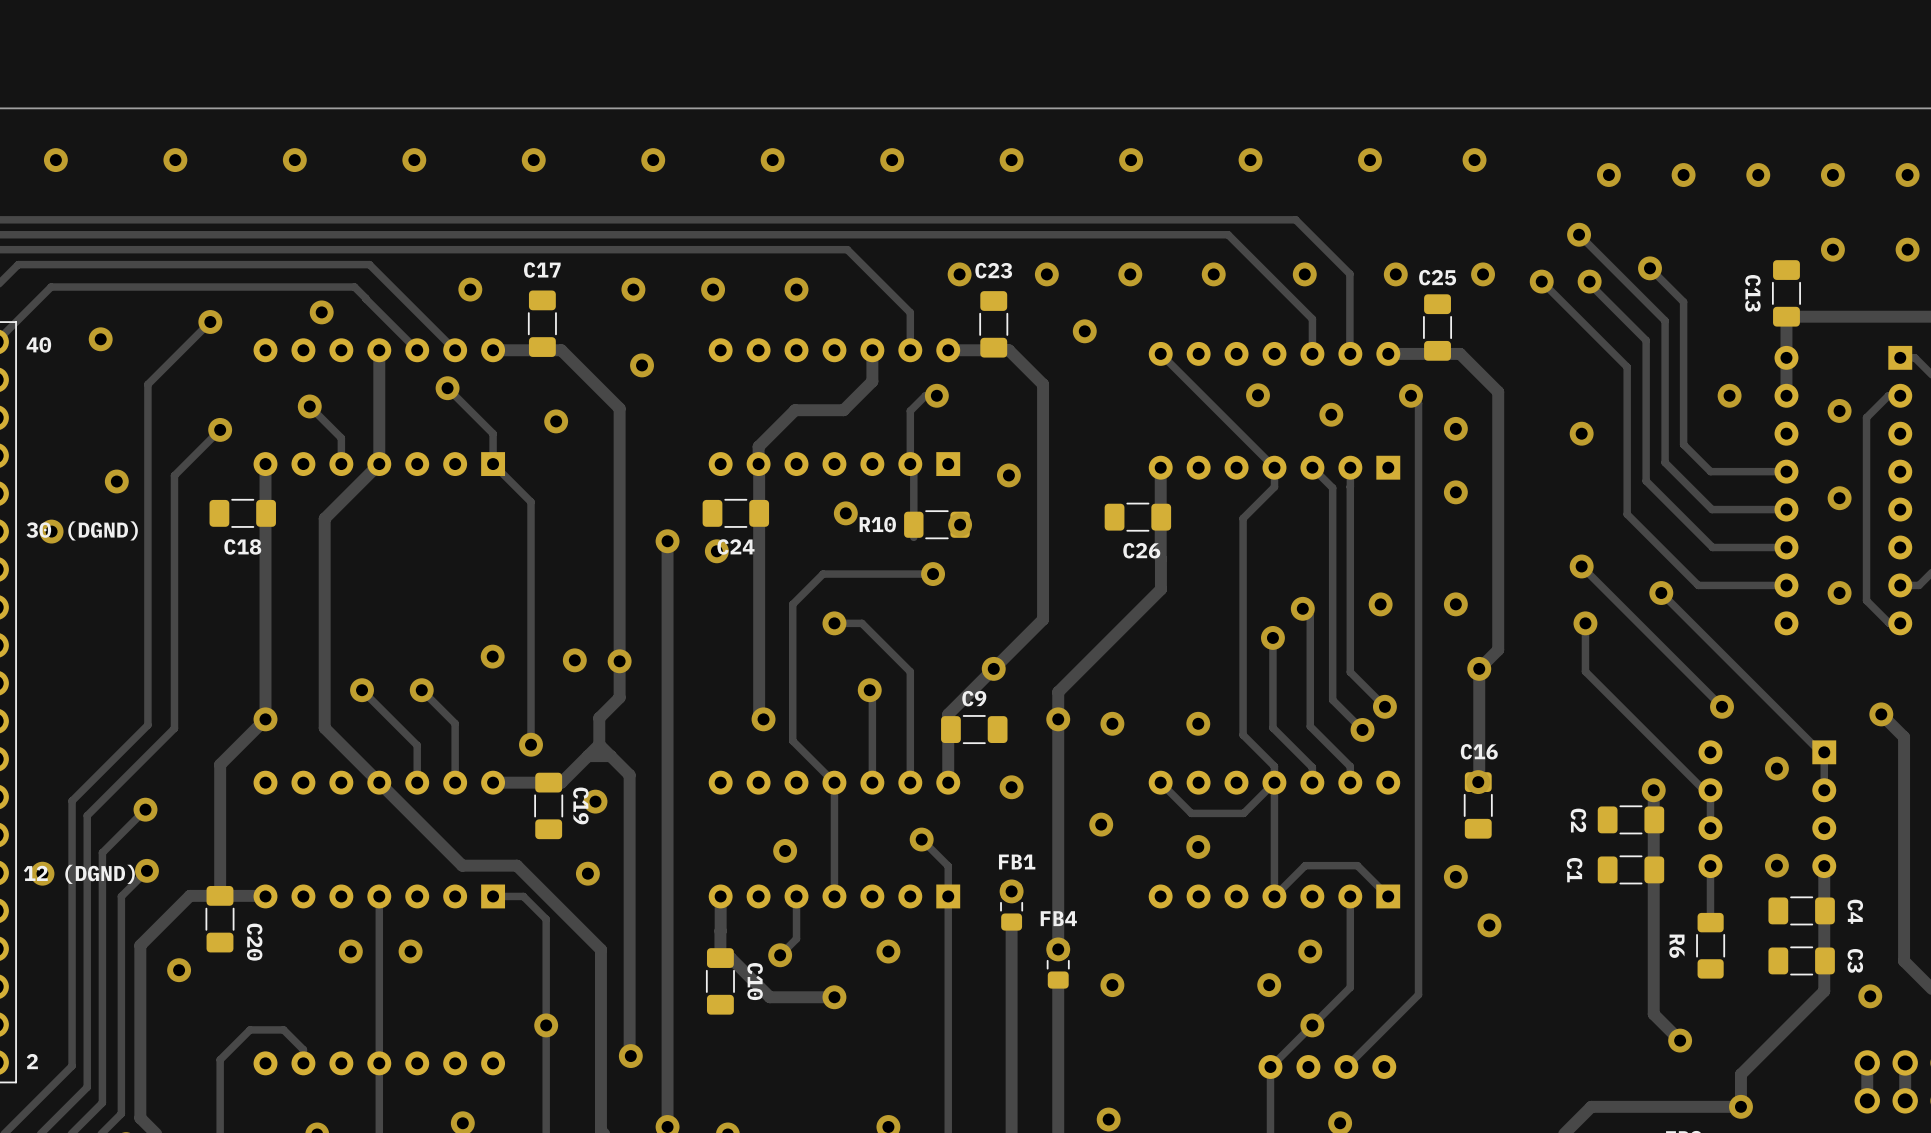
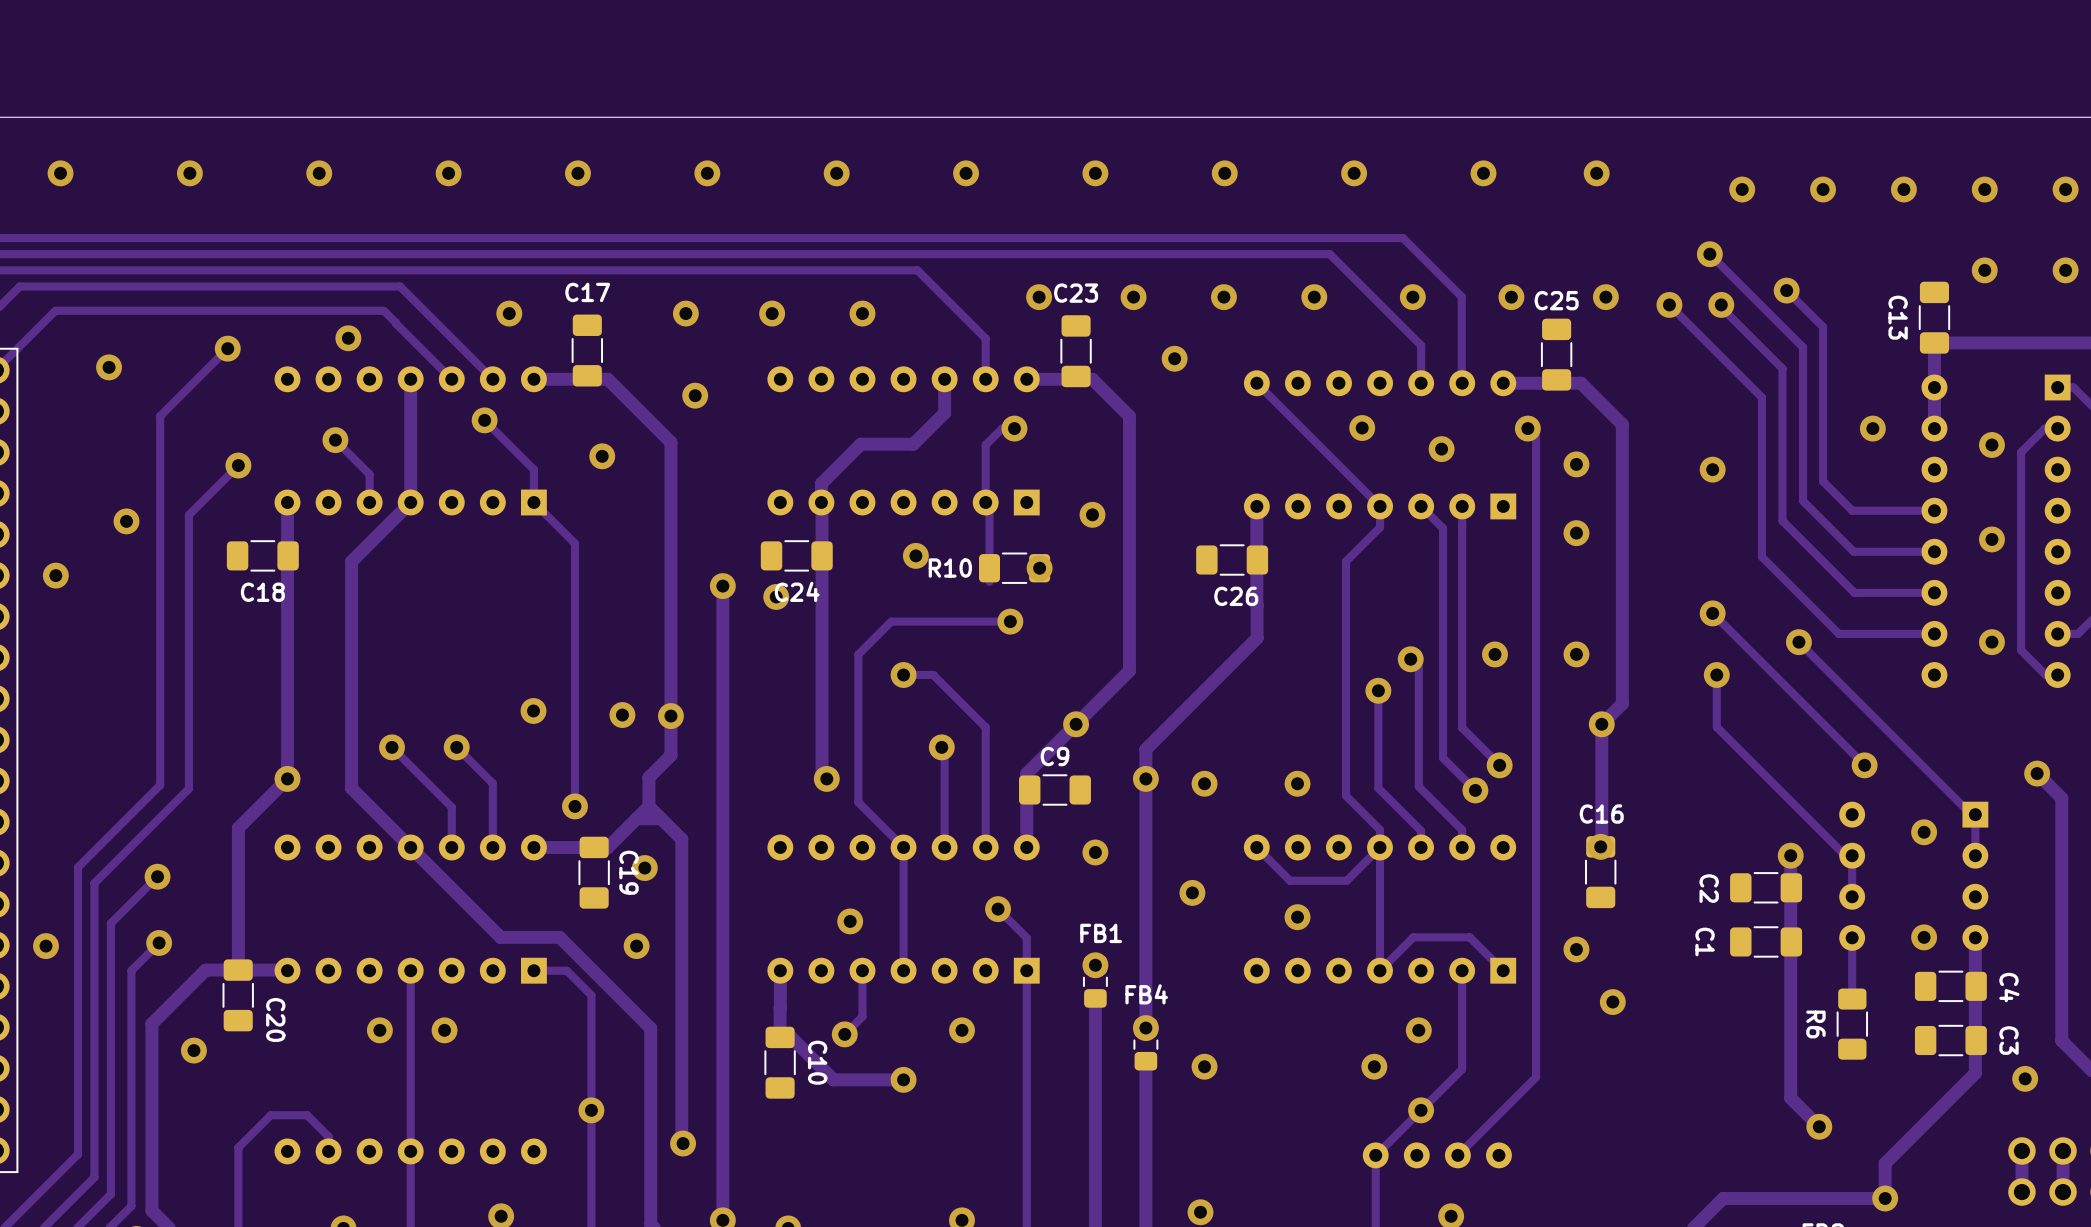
text: 40 (38, 344) -> none
text: 30 (DGND) (82, 530) -> none
text: 12 (DGND) (79, 874) -> none
text: 2 (32, 1061) -> none

